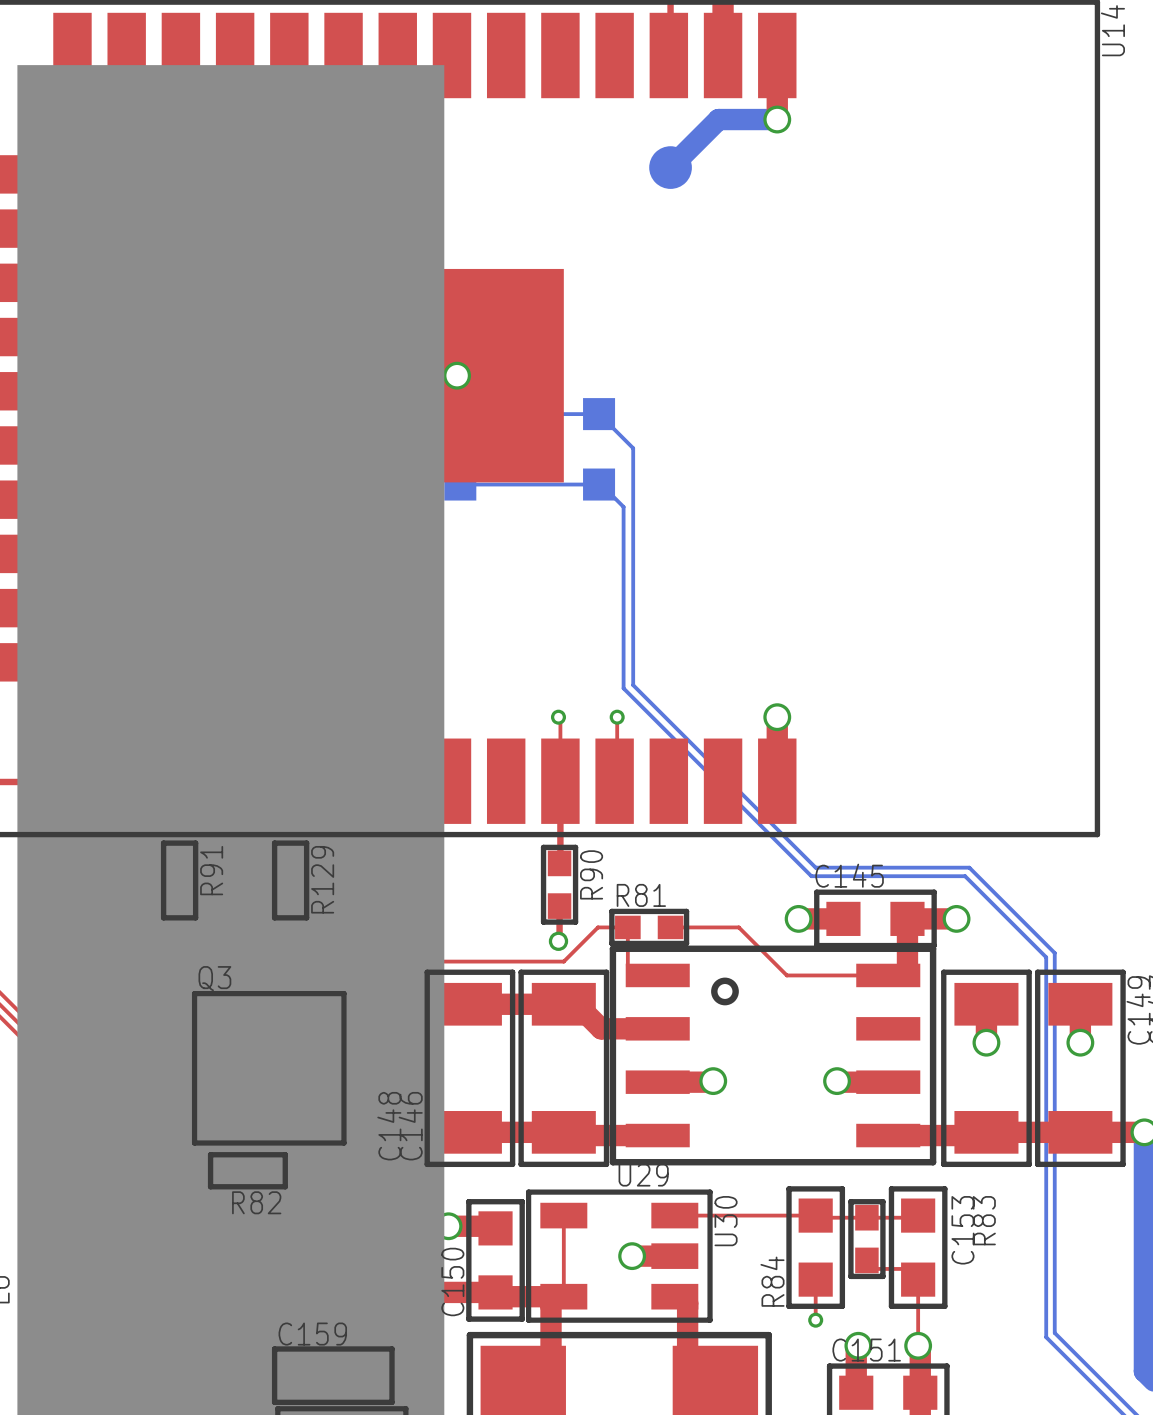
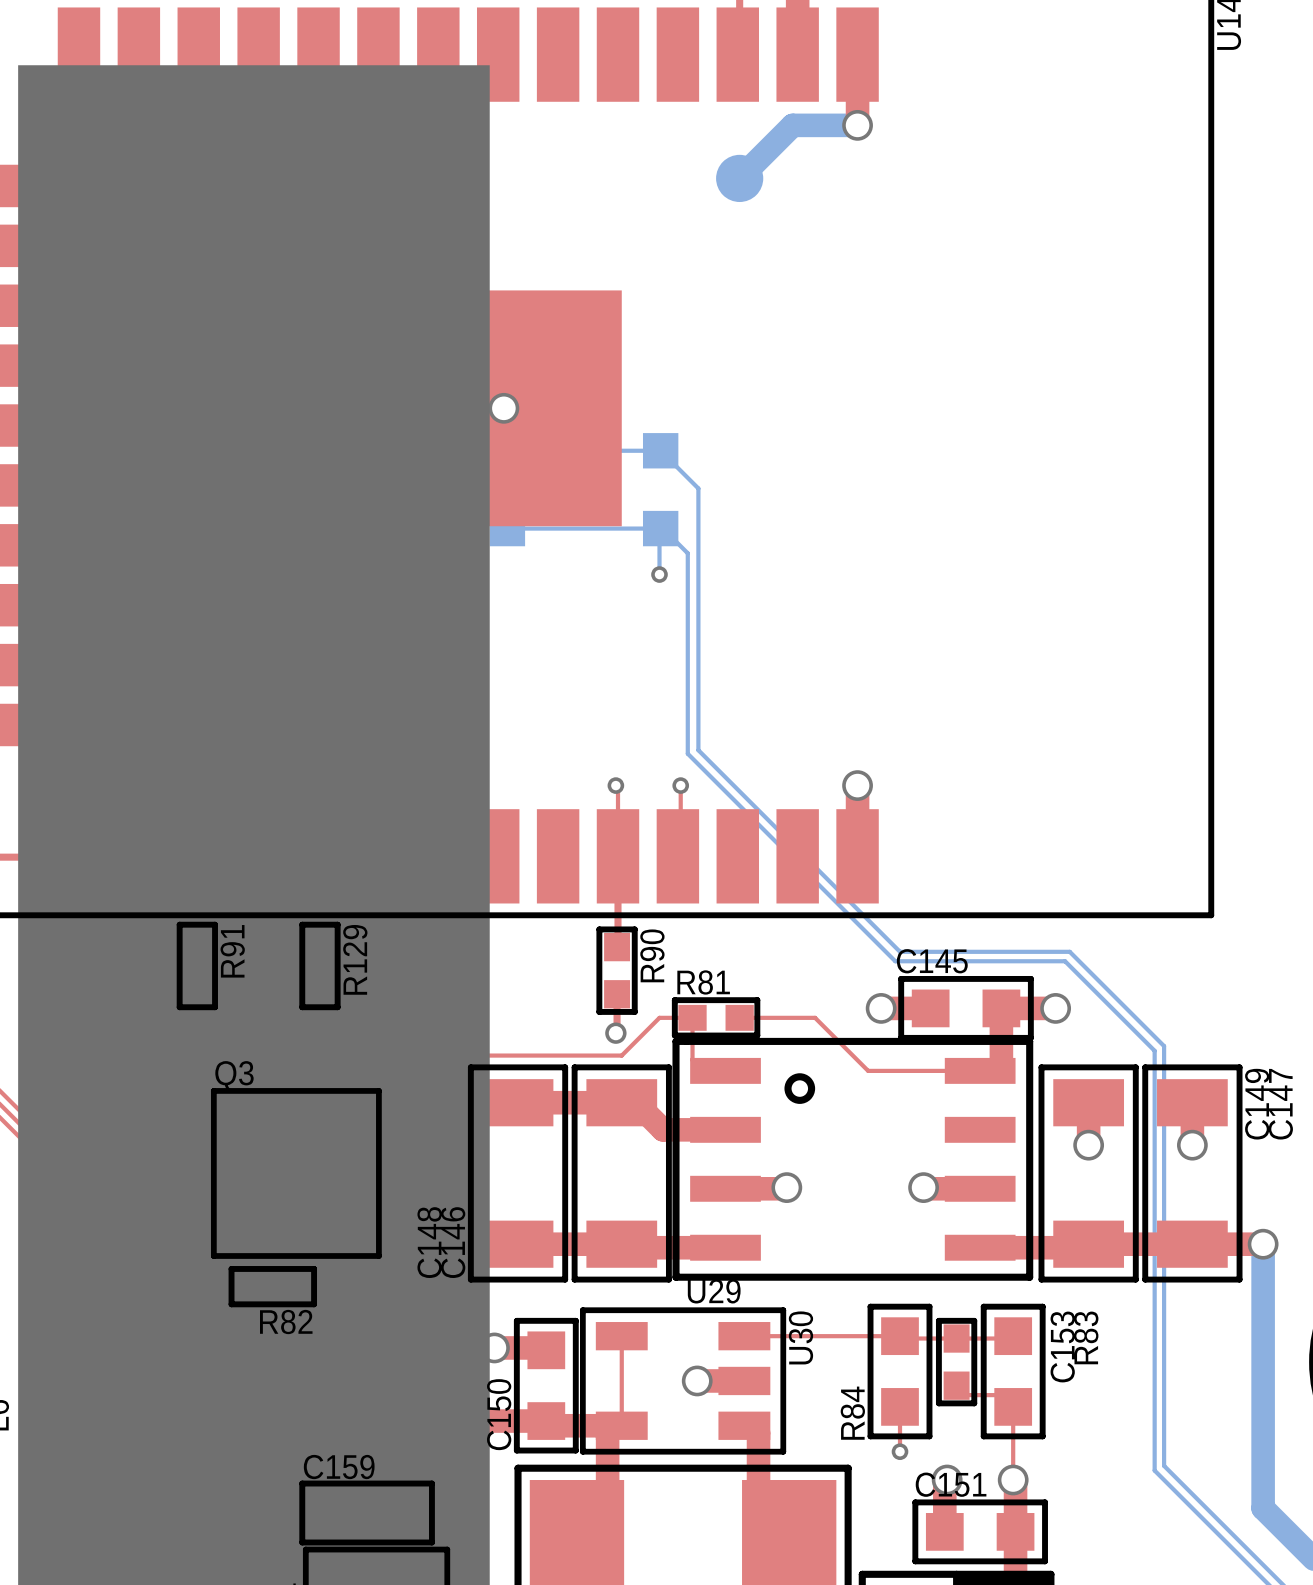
bottom track: none -> (660, 528) (659, 574)
via: none -> (659, 574)

